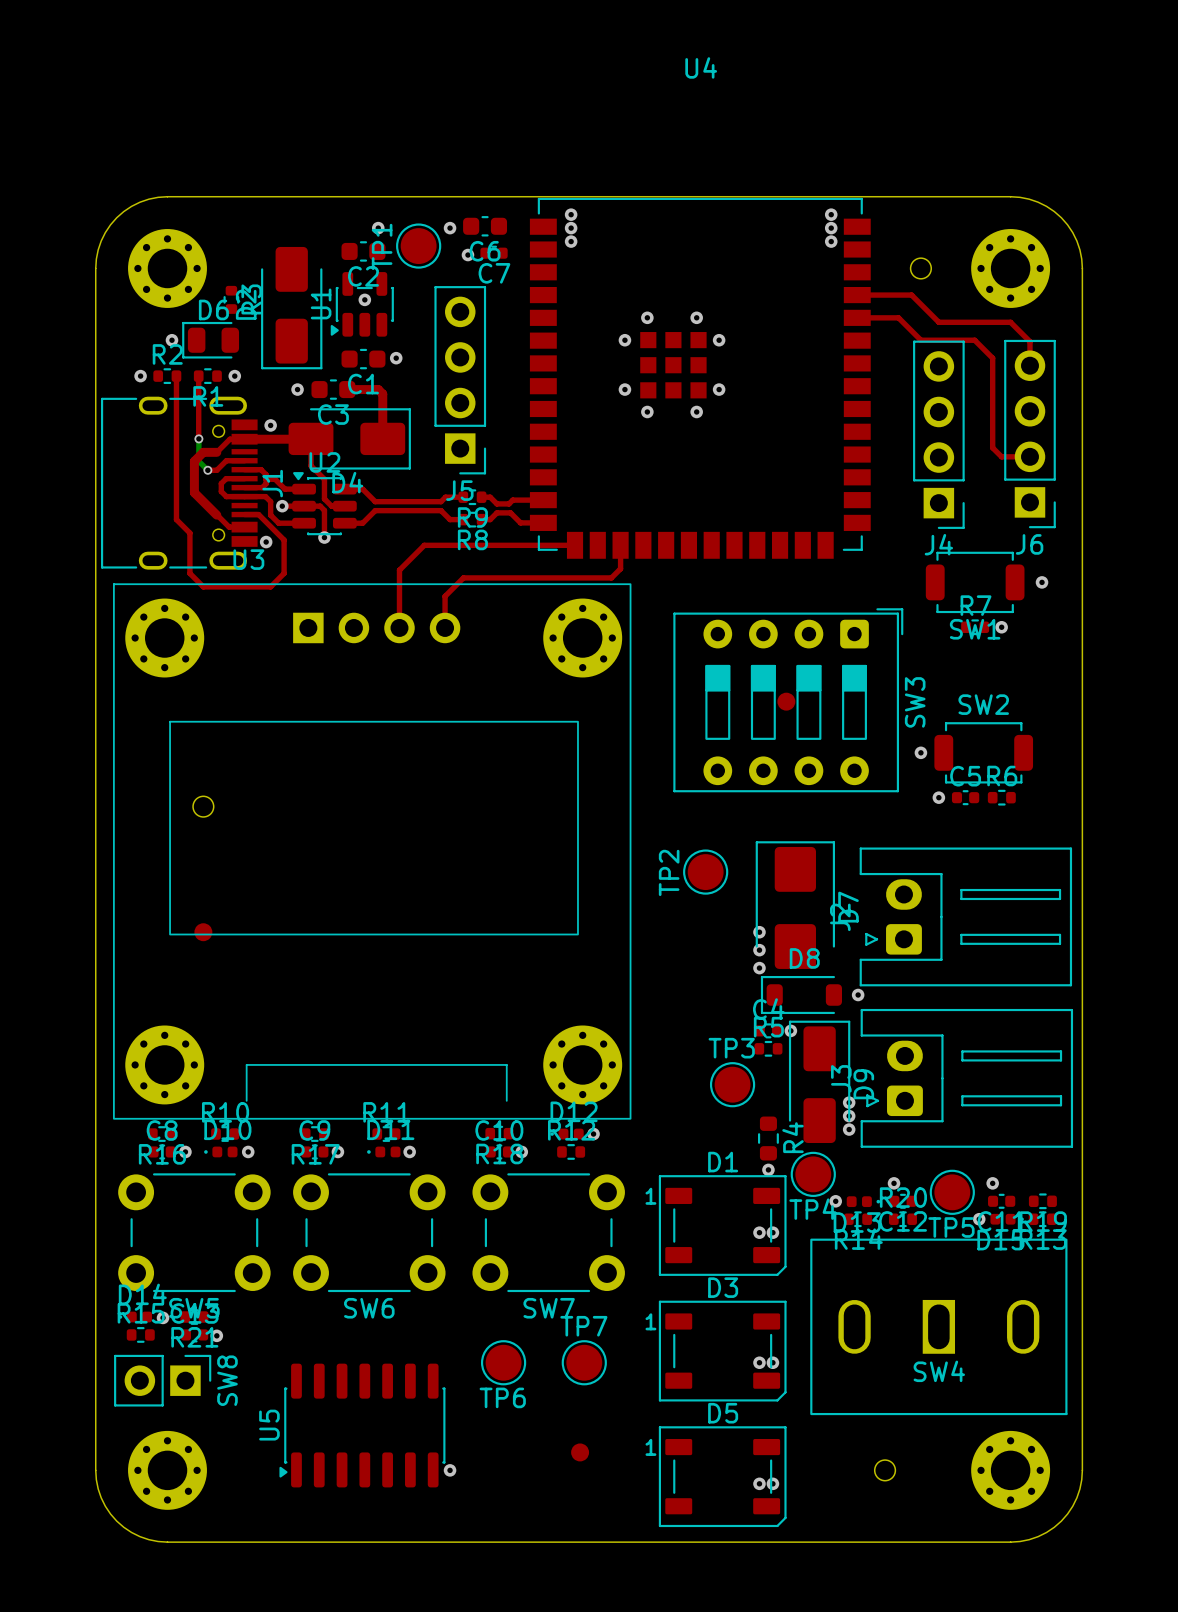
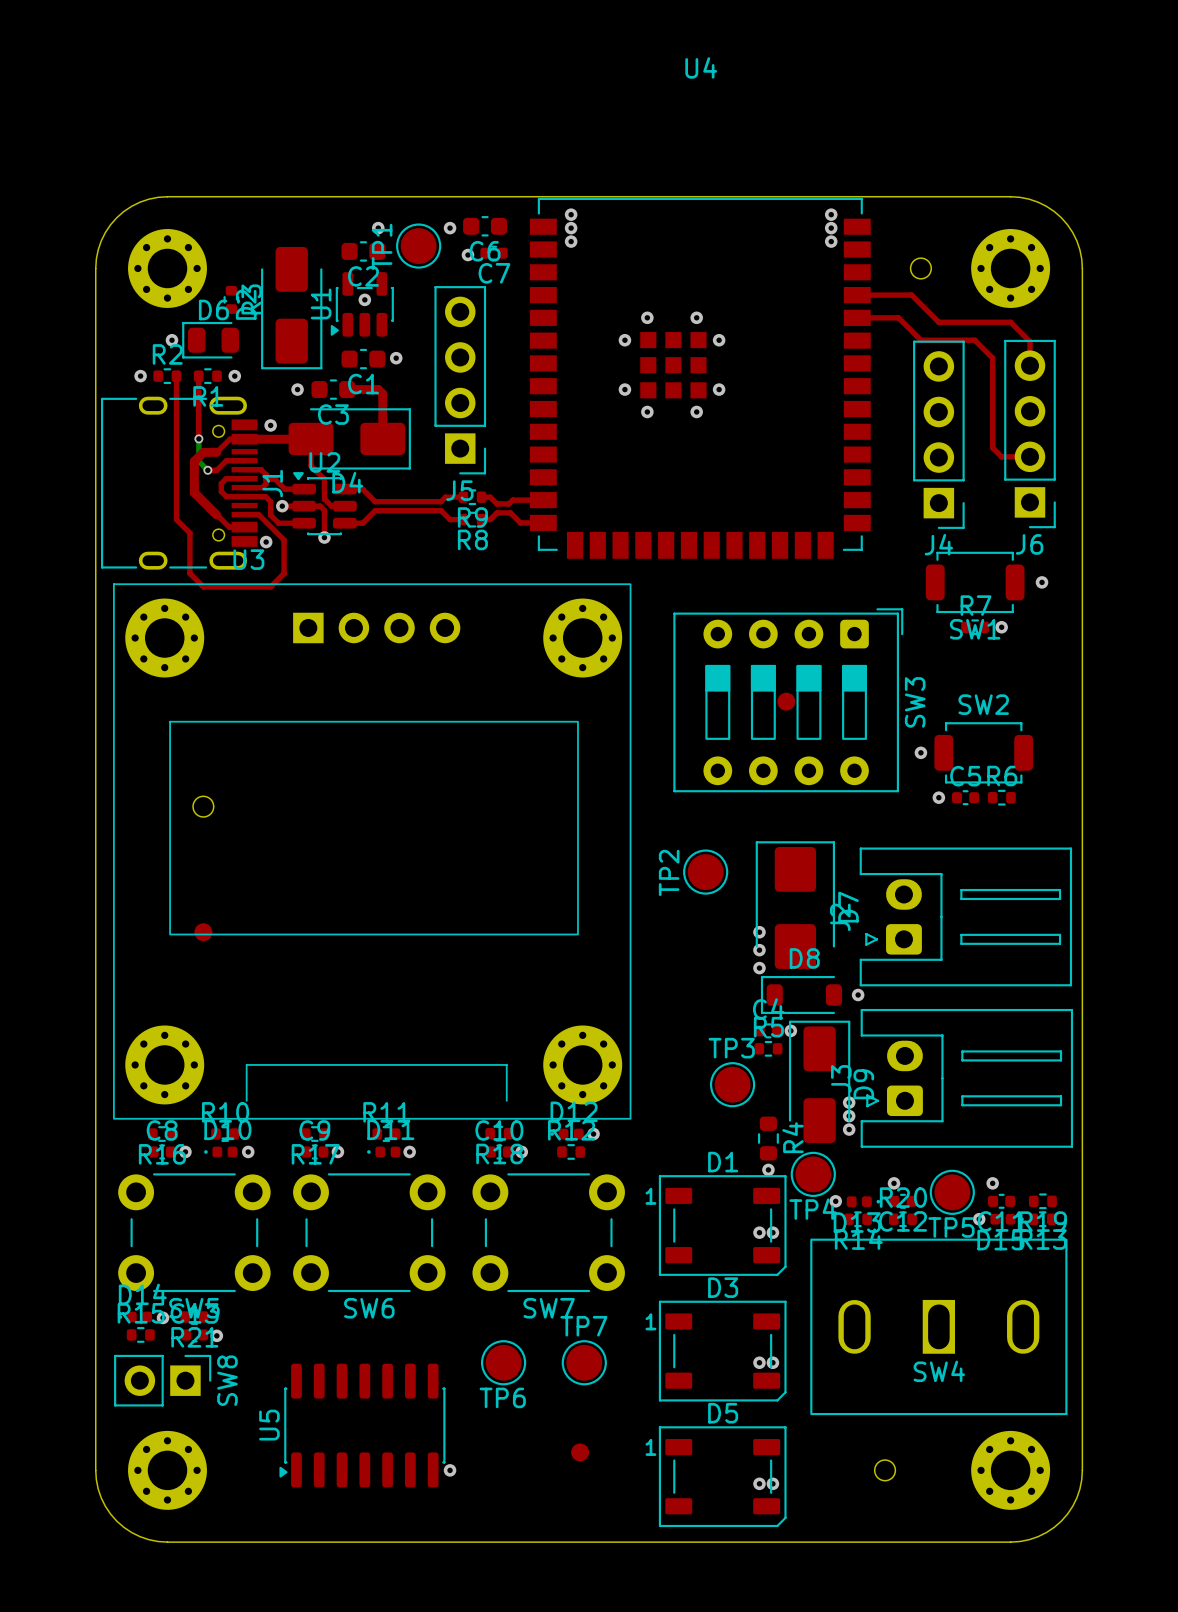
top track: (575, 545) (424, 545) (399, 570) (399, 627) -> none
top track: (620, 545) (620, 568) (611, 577) (463, 577) (445, 596) (445, 627) -> none

